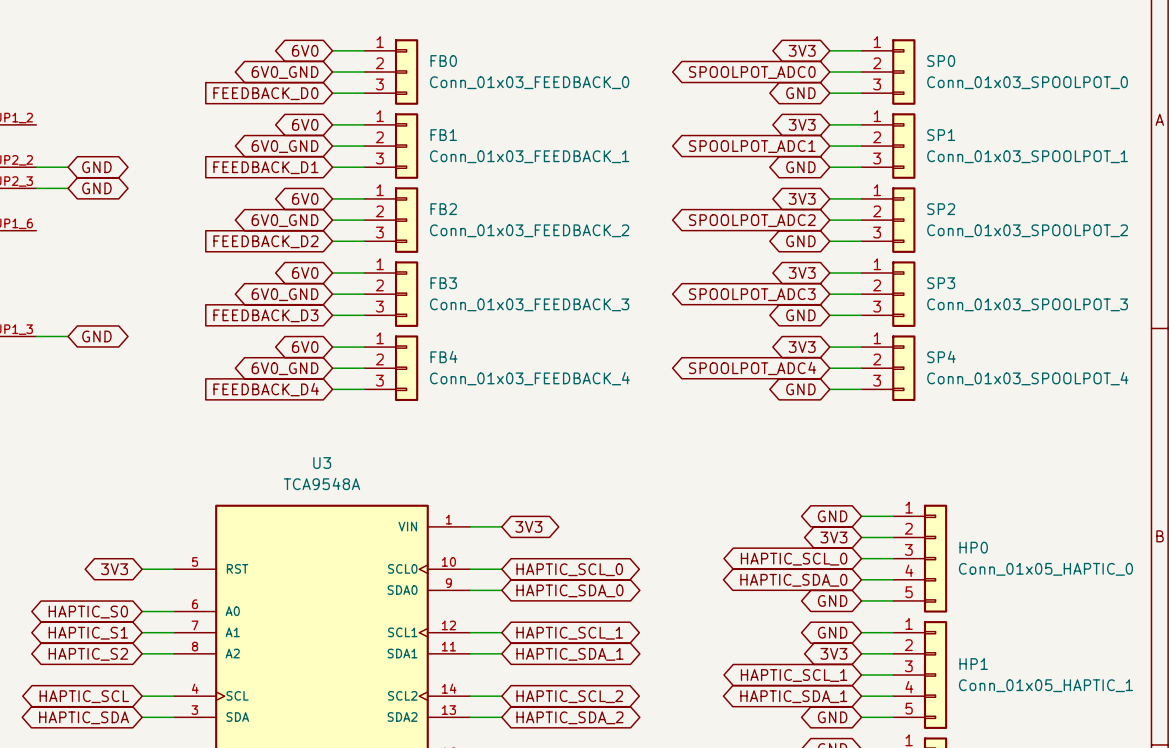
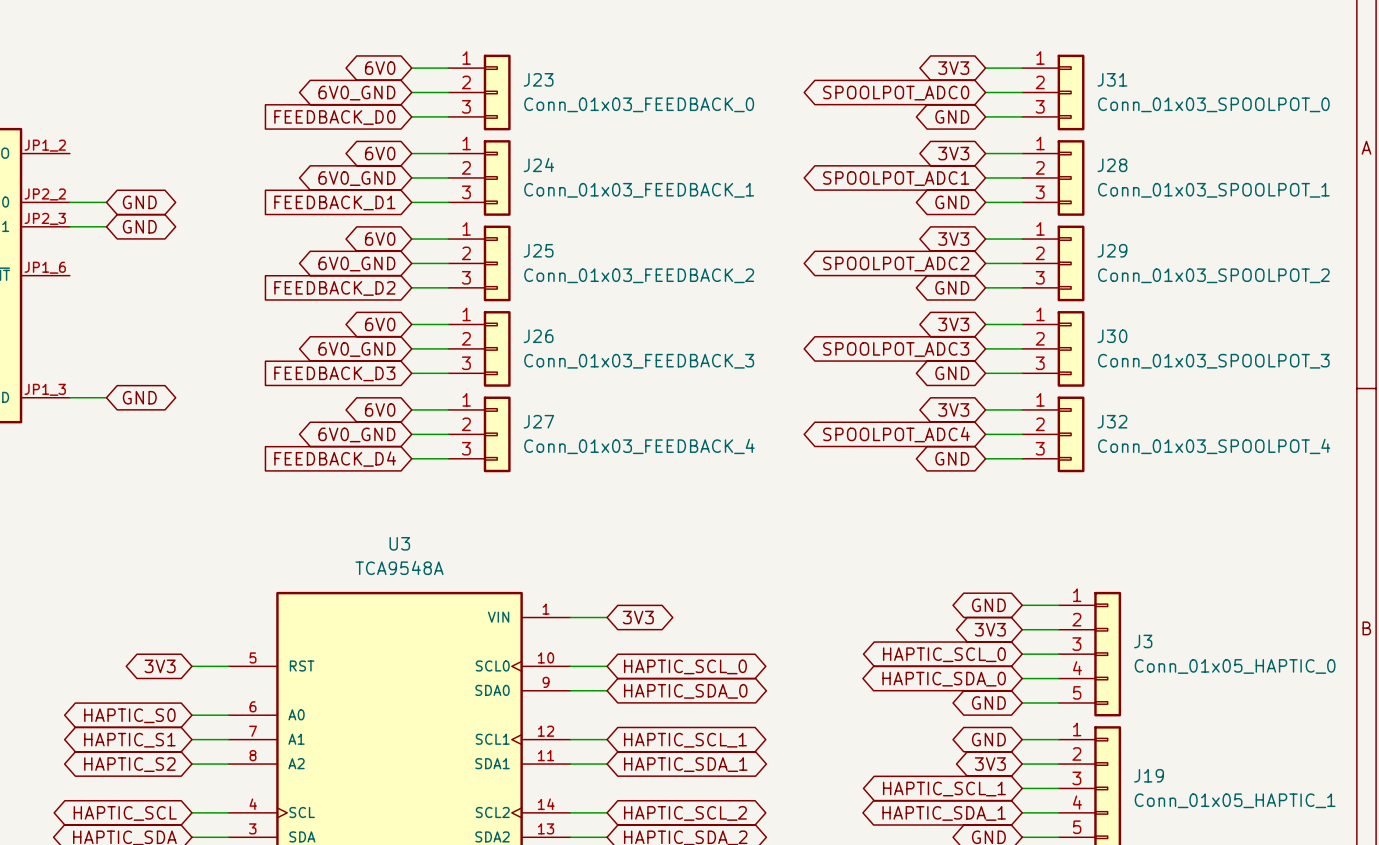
FB0 name: FB0 (443, 61) -> J23 (538, 79)
SP0 name: SP0 (941, 61) -> J31 (1112, 79)
FB1 name: FB1 (443, 135) -> J24 (538, 165)
SP1 name: SP1 (941, 135) -> J28 (1112, 165)
FB2 name: FB2 (443, 209) -> J25 (538, 250)
SP2 name: SP2 (941, 209) -> J29 (1112, 250)
FB3 name: FB3 (443, 283) -> J26 (538, 336)
SP3 name: SP3 (941, 283) -> J30 (1112, 336)
FB4 name: FB4 (443, 356) -> J27 (538, 421)
SP4 name: SP4 (941, 356) -> J32 (1112, 421)
HP0 name: HP0 (973, 547) -> J3 (1143, 641)
HP1 name: HP1 (973, 664) -> J19 (1149, 775)

